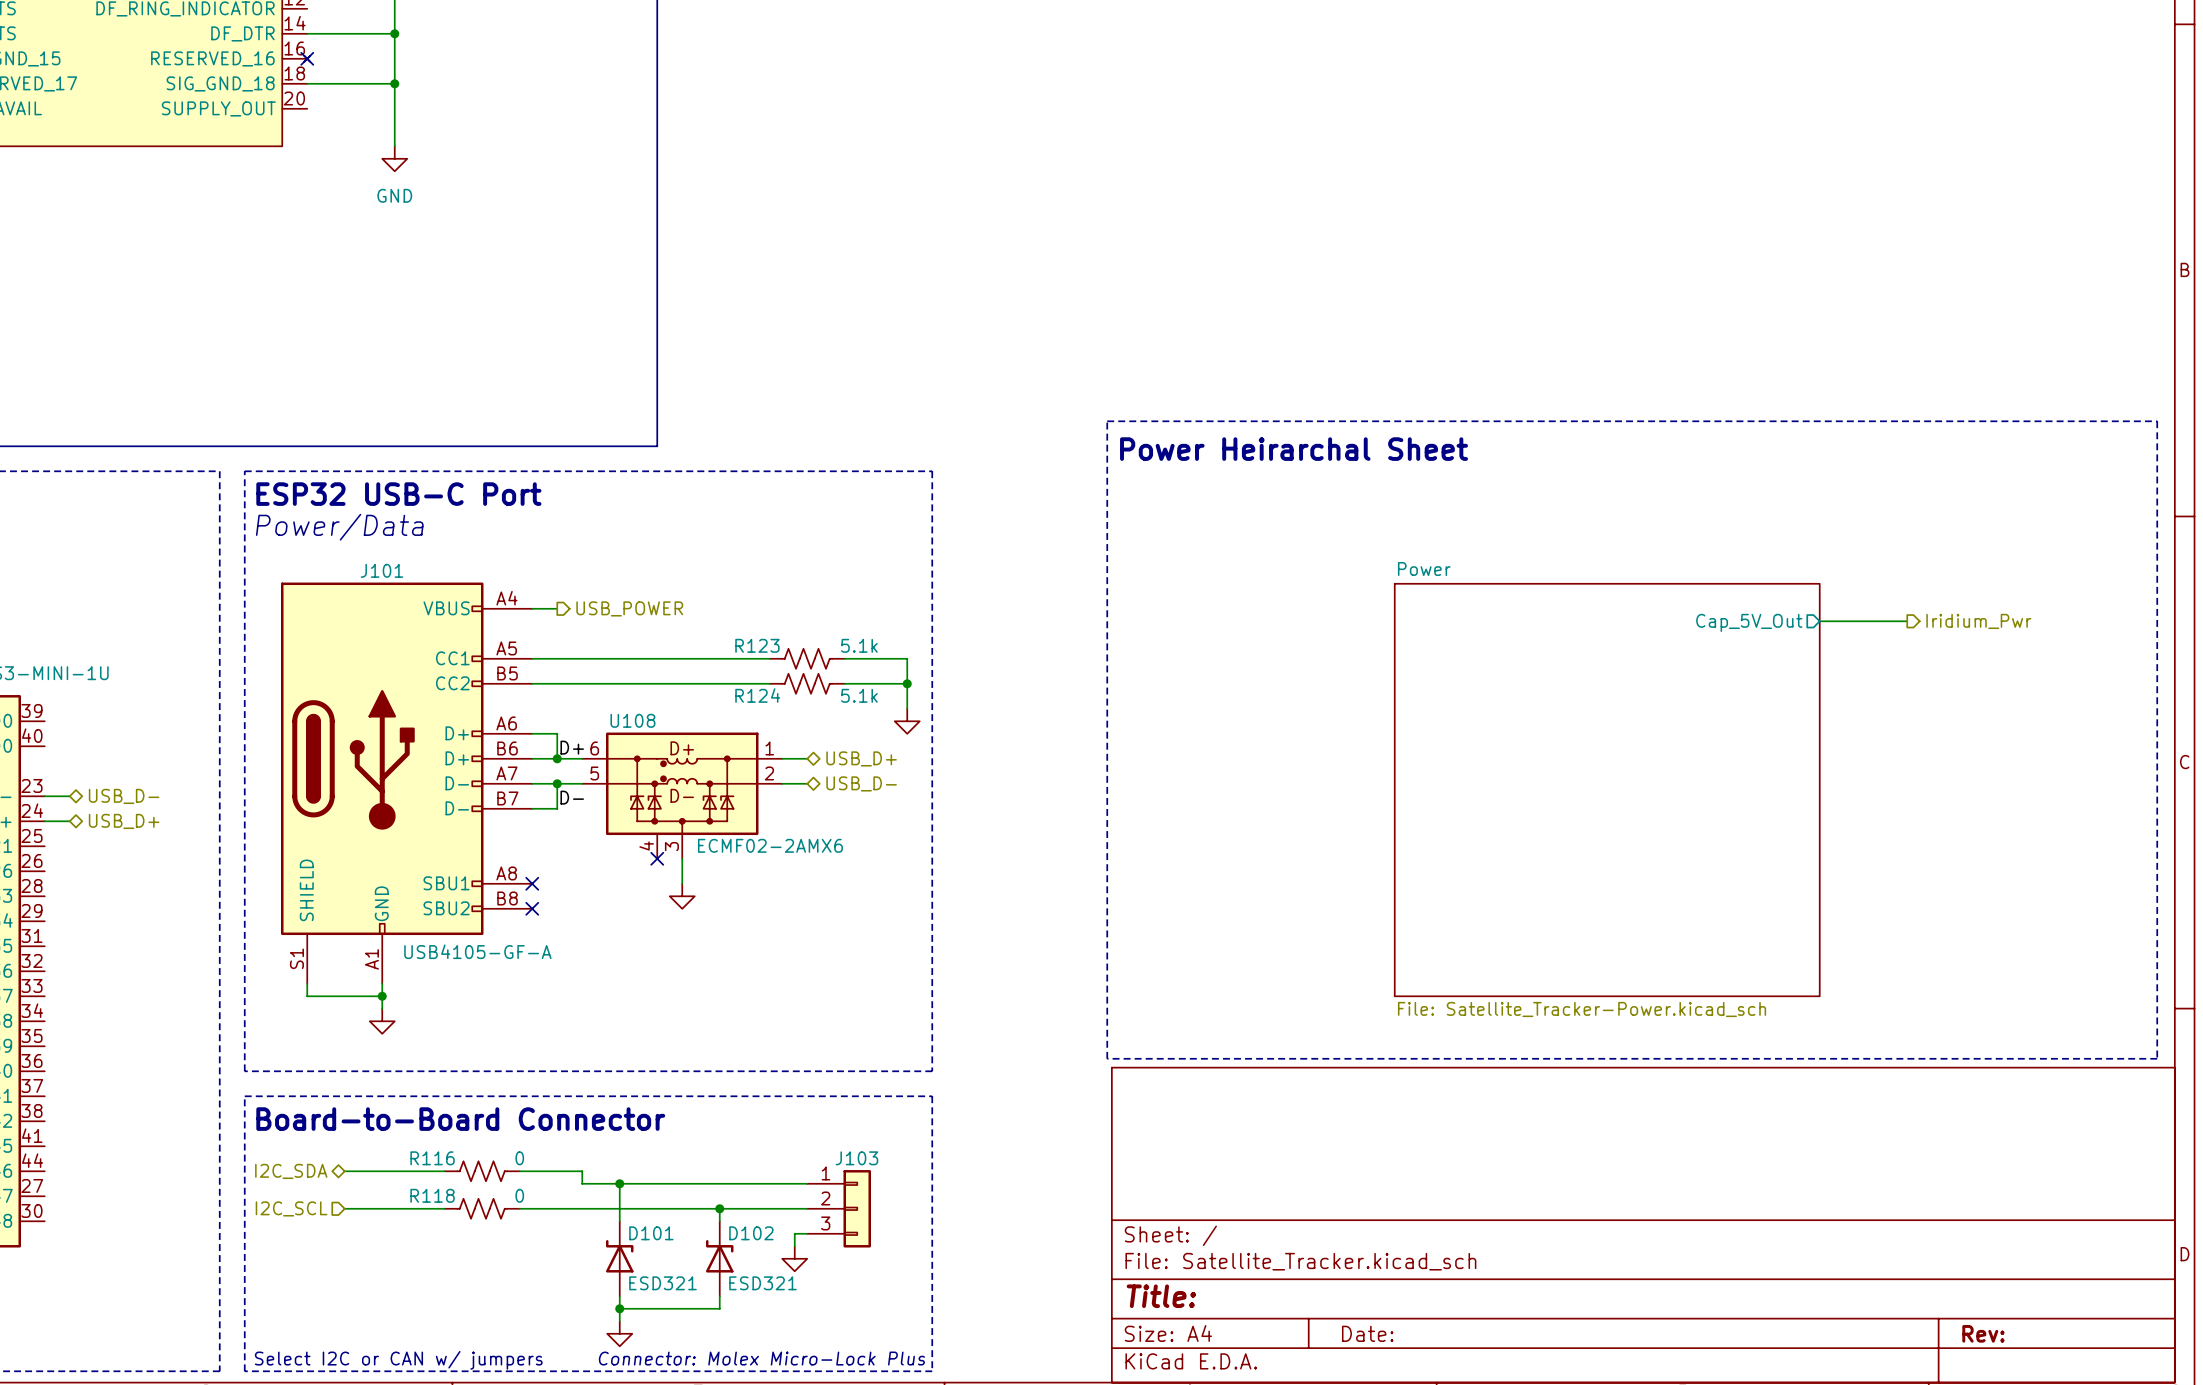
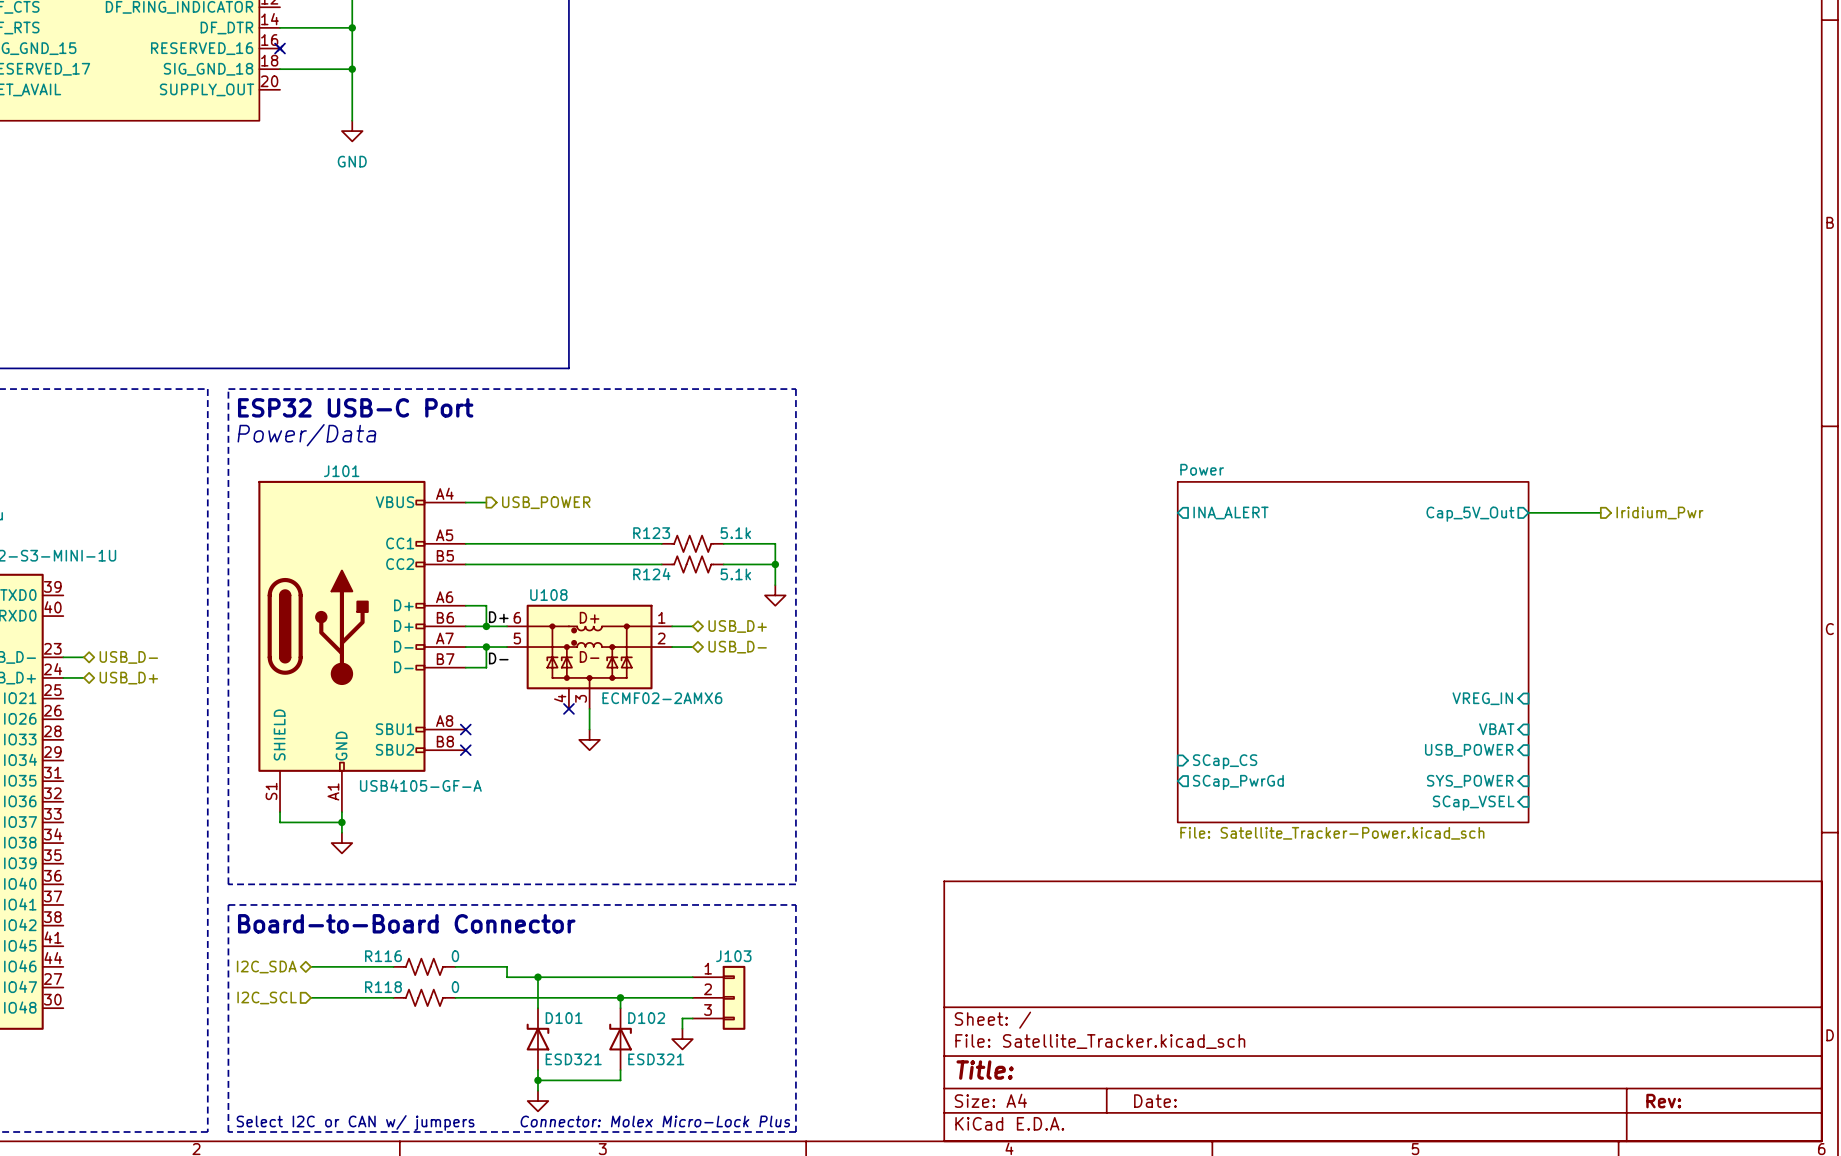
line: (1107, 421) (2157, 421) (2157, 1058) (1107, 1058) (1107, 421) -> none
text: Power Heirarchal Sheet (1294, 449) -> none
sheet pin: none -> INA_ALERT (1230, 512)
sheet pin: none -> VREG_IN (1482, 698)
sheet pin: none -> VBAT (1496, 729)
sheet pin: none -> USB_POWER (1469, 750)
sheet pin: none -> SCap_CS (1225, 761)
sheet pin: none -> SYS_POWER (1470, 781)
sheet pin: none -> SCap_PwrGd (1238, 782)
sheet pin: none -> SCap_VSEL (1473, 803)

